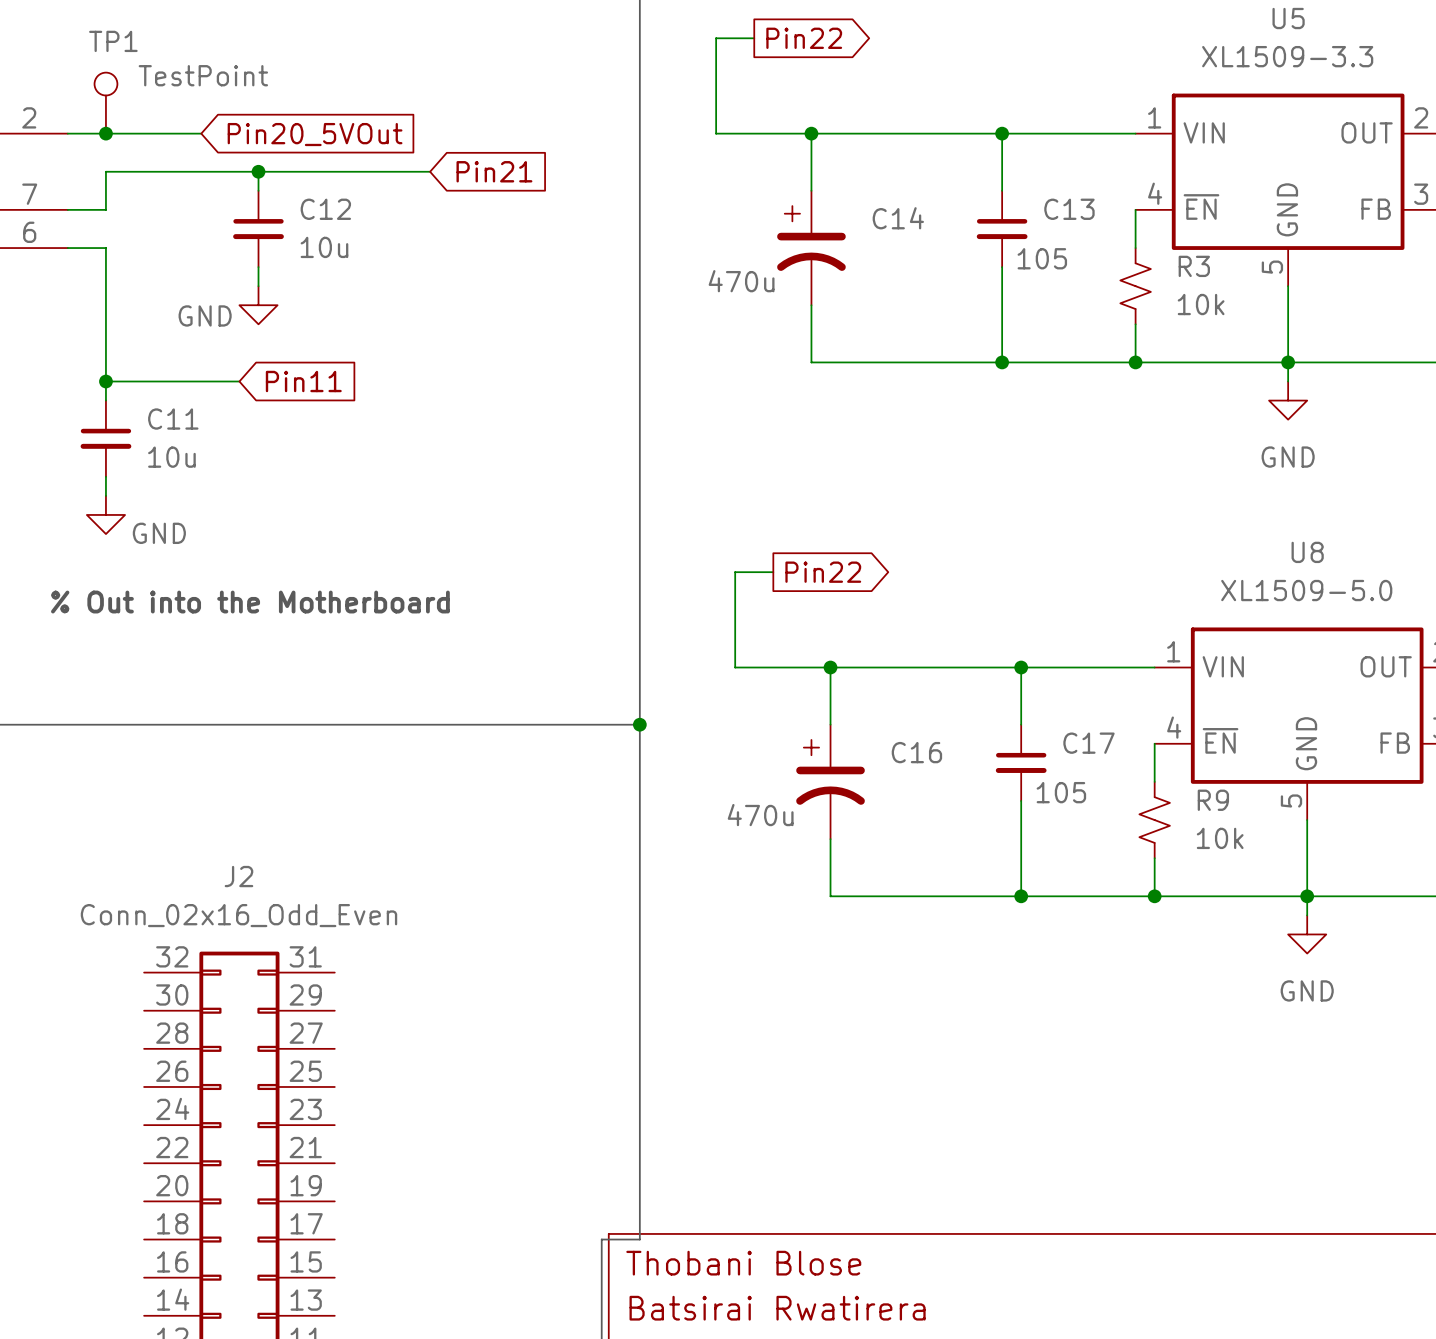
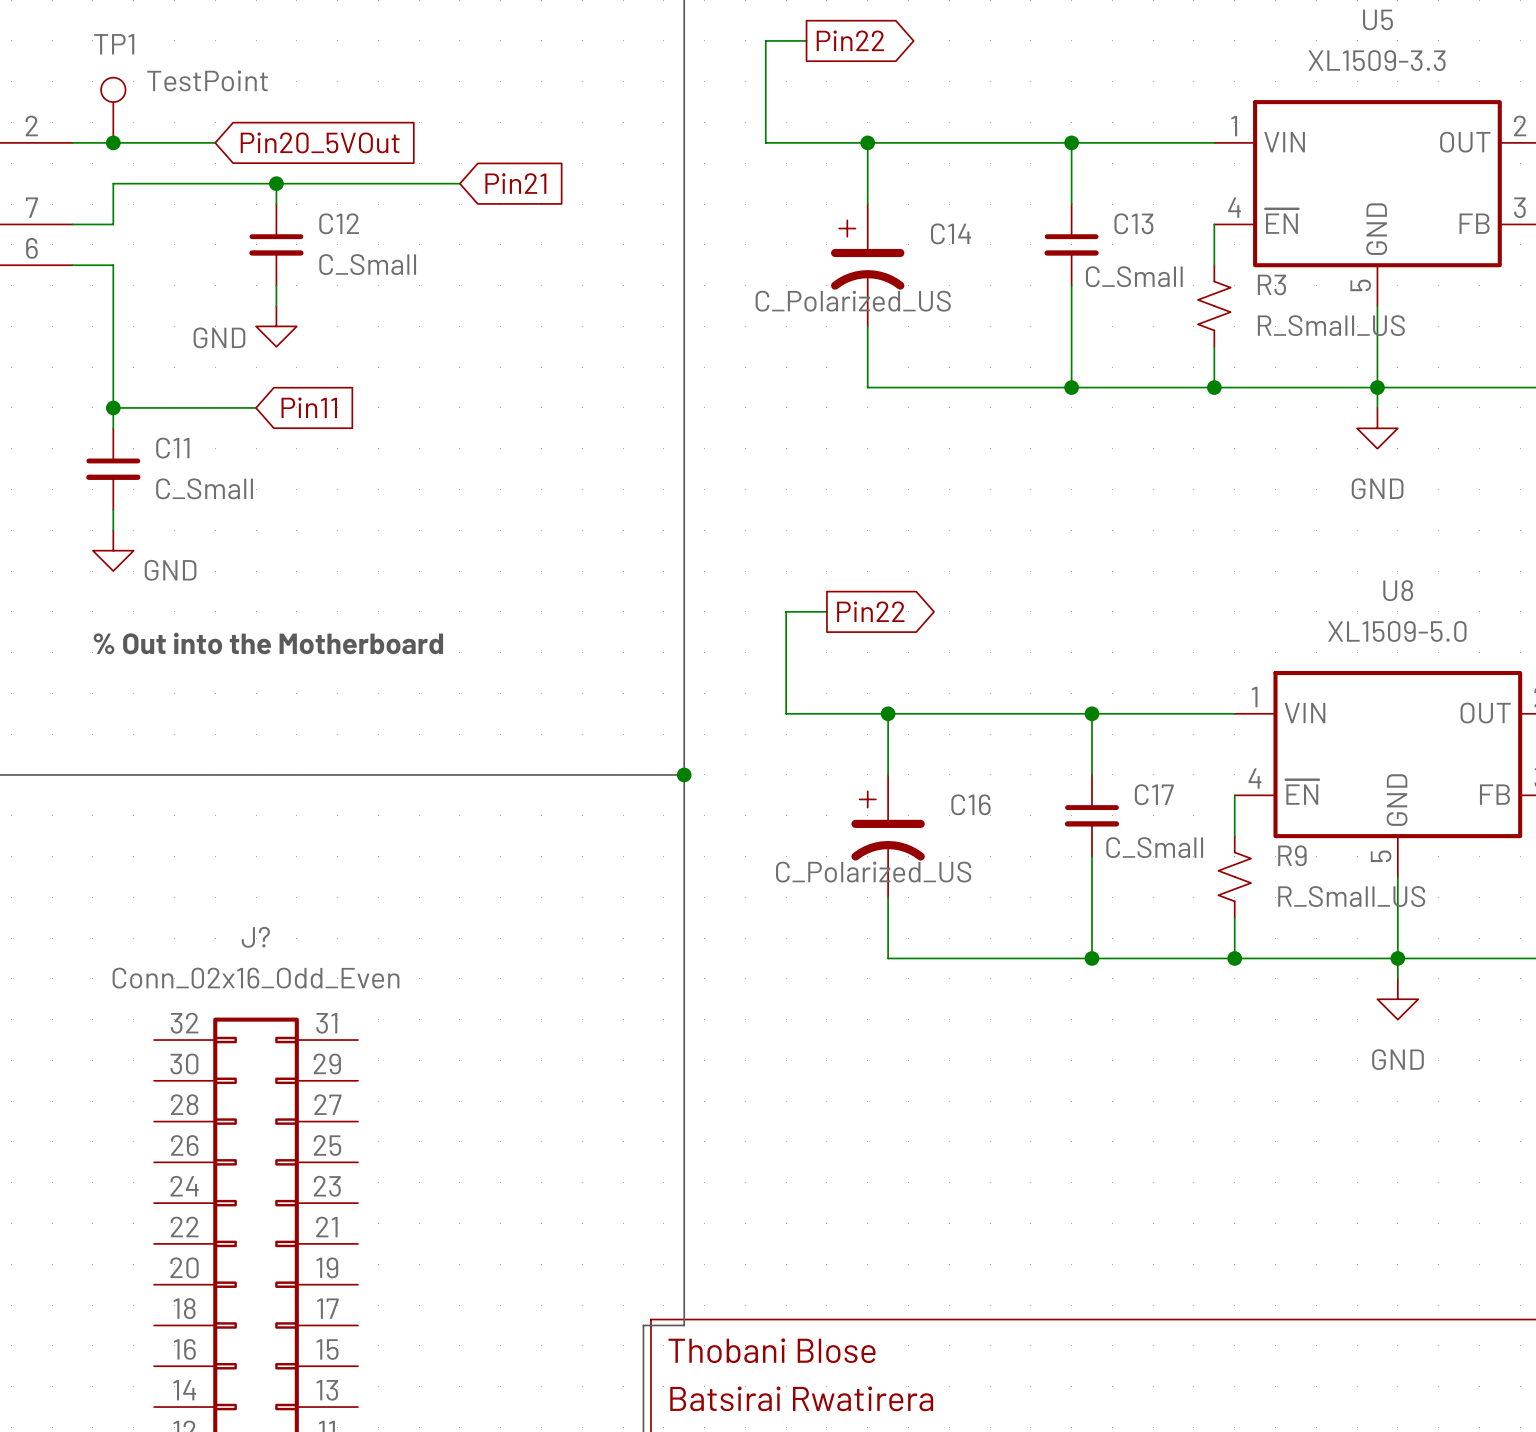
C12 value: 10u (324, 247) -> C_Small (367, 264)
C13 value: 105 (1042, 258) -> C_Small (1134, 276)
C14 value: 470u (741, 281) -> C_Polarized_US (853, 301)
R3 value: 10k (1201, 304) -> R_Small_US (1331, 325)
C11 value: 10u (171, 457) -> C_Small (204, 488)
C17 value: 105 (1061, 792) -> C_Small (1154, 847)
C16 value: 470u (760, 815) -> C_Polarized_US (873, 872)
R9 value: 10k (1220, 838) -> R_Small_US (1351, 896)
J2 name: J2 (238, 876) -> J? (255, 937)

